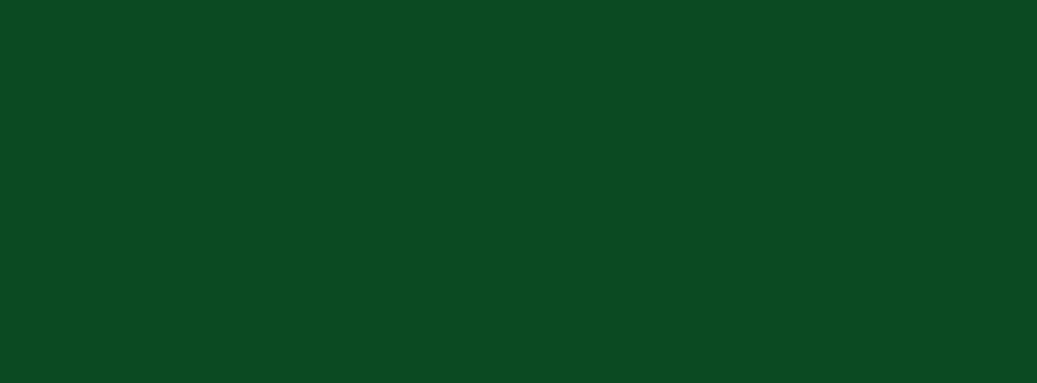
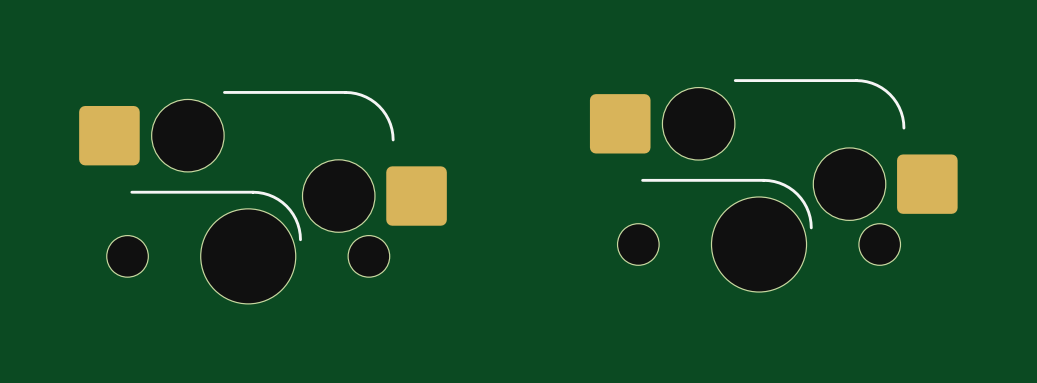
part: none -> (773, 185)
part: none -> (262, 197)

